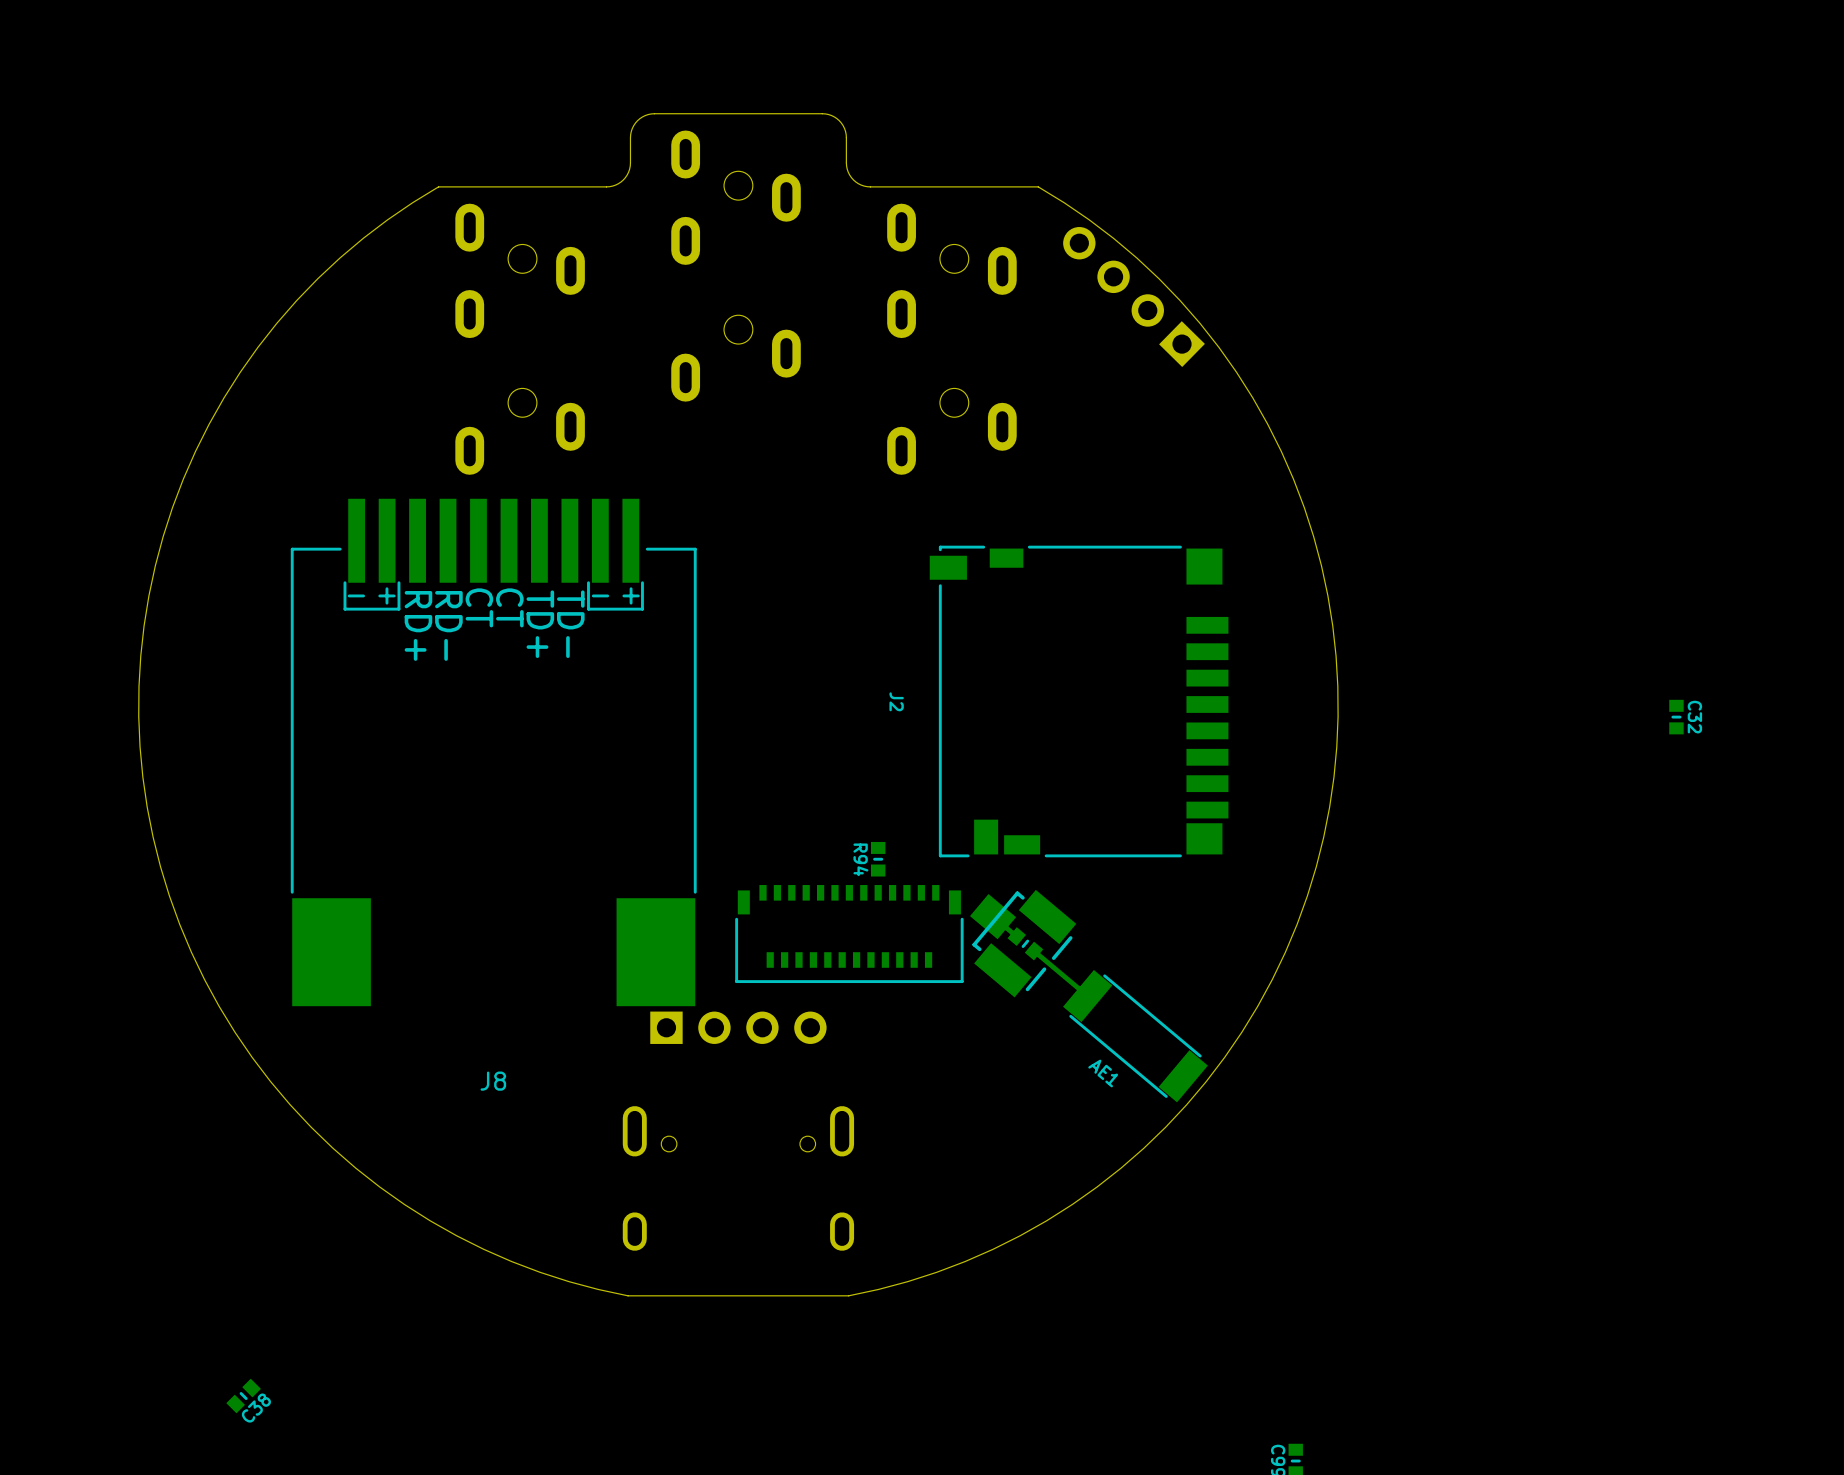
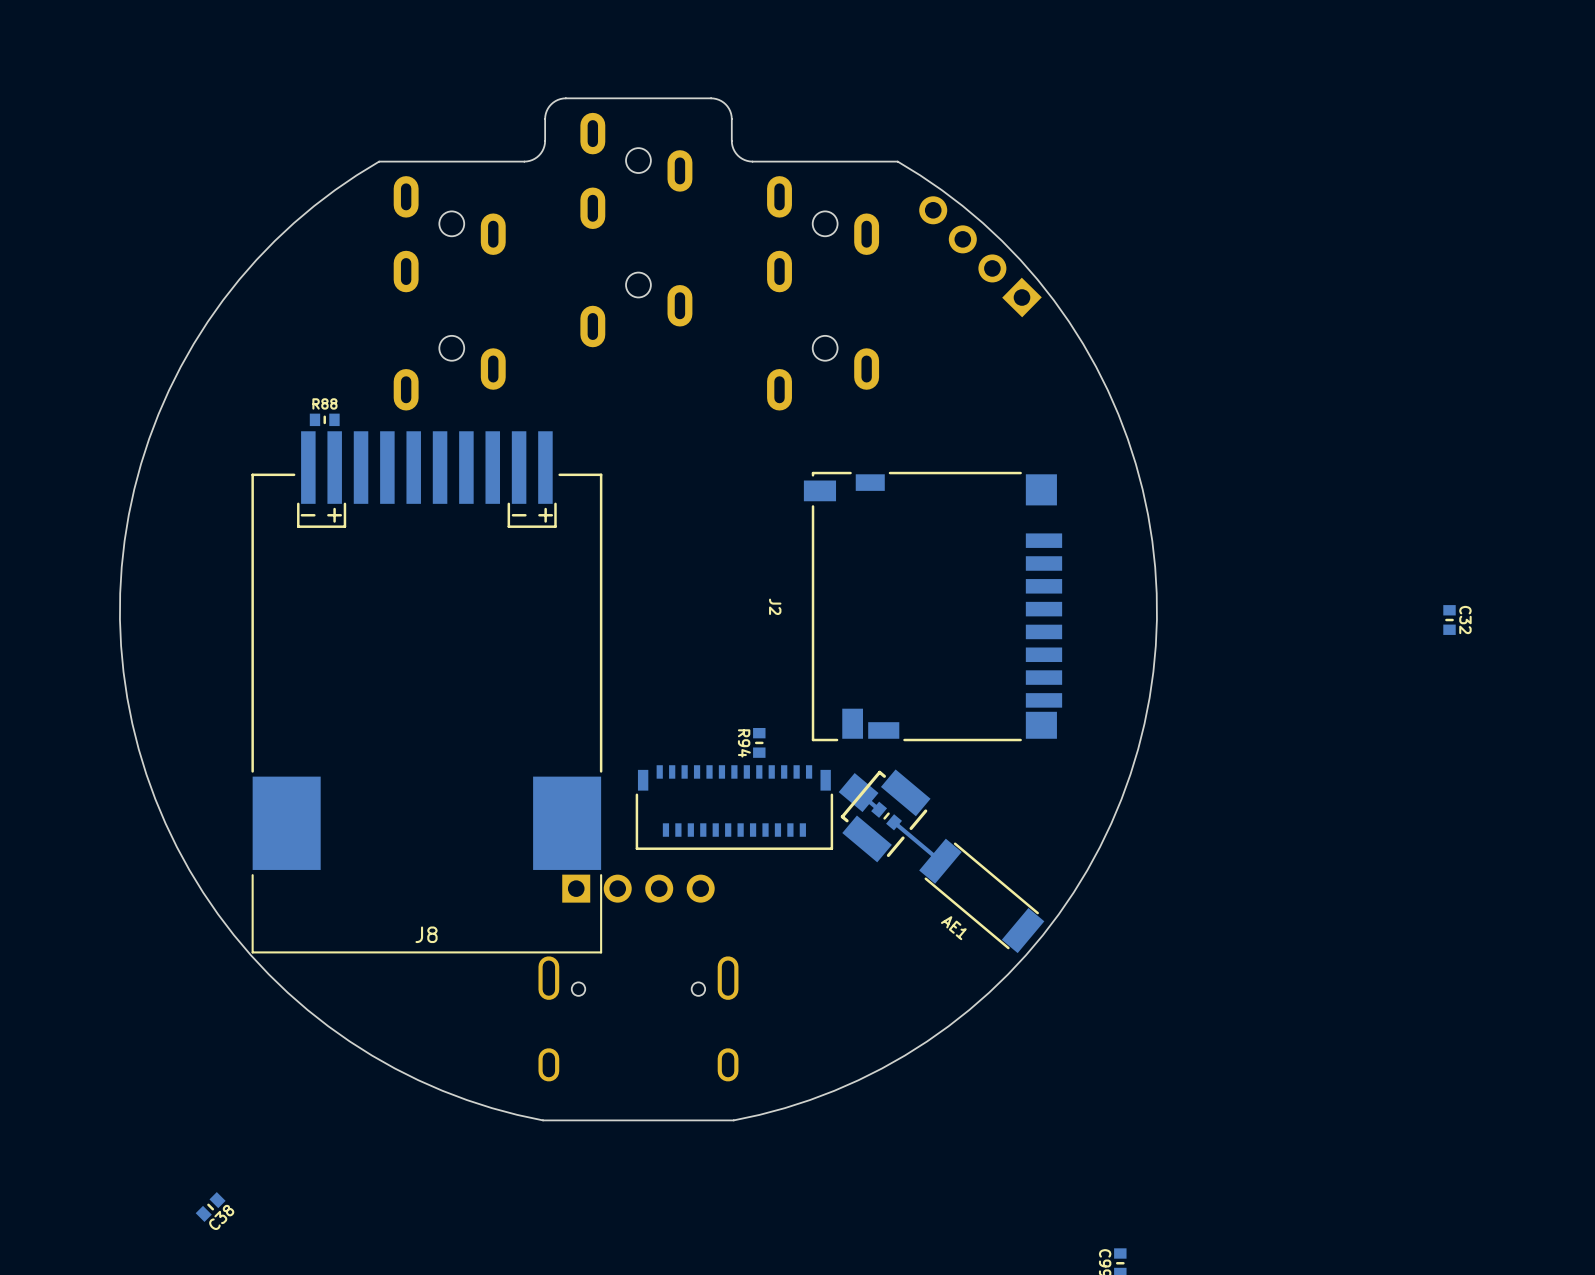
R88: none -> (324, 419)
J8 text: CT (479, 607) -> none
J8 text: CT (509, 607) -> none
J8 text: TD+ (540, 624) -> none
J8 text: TD- (570, 624) -> none
J8 text: RD+ (418, 625) -> none
J8 text: RD- (448, 625) -> none
line: none -> (601, 875) (601, 952) (252, 952) (252, 875)

